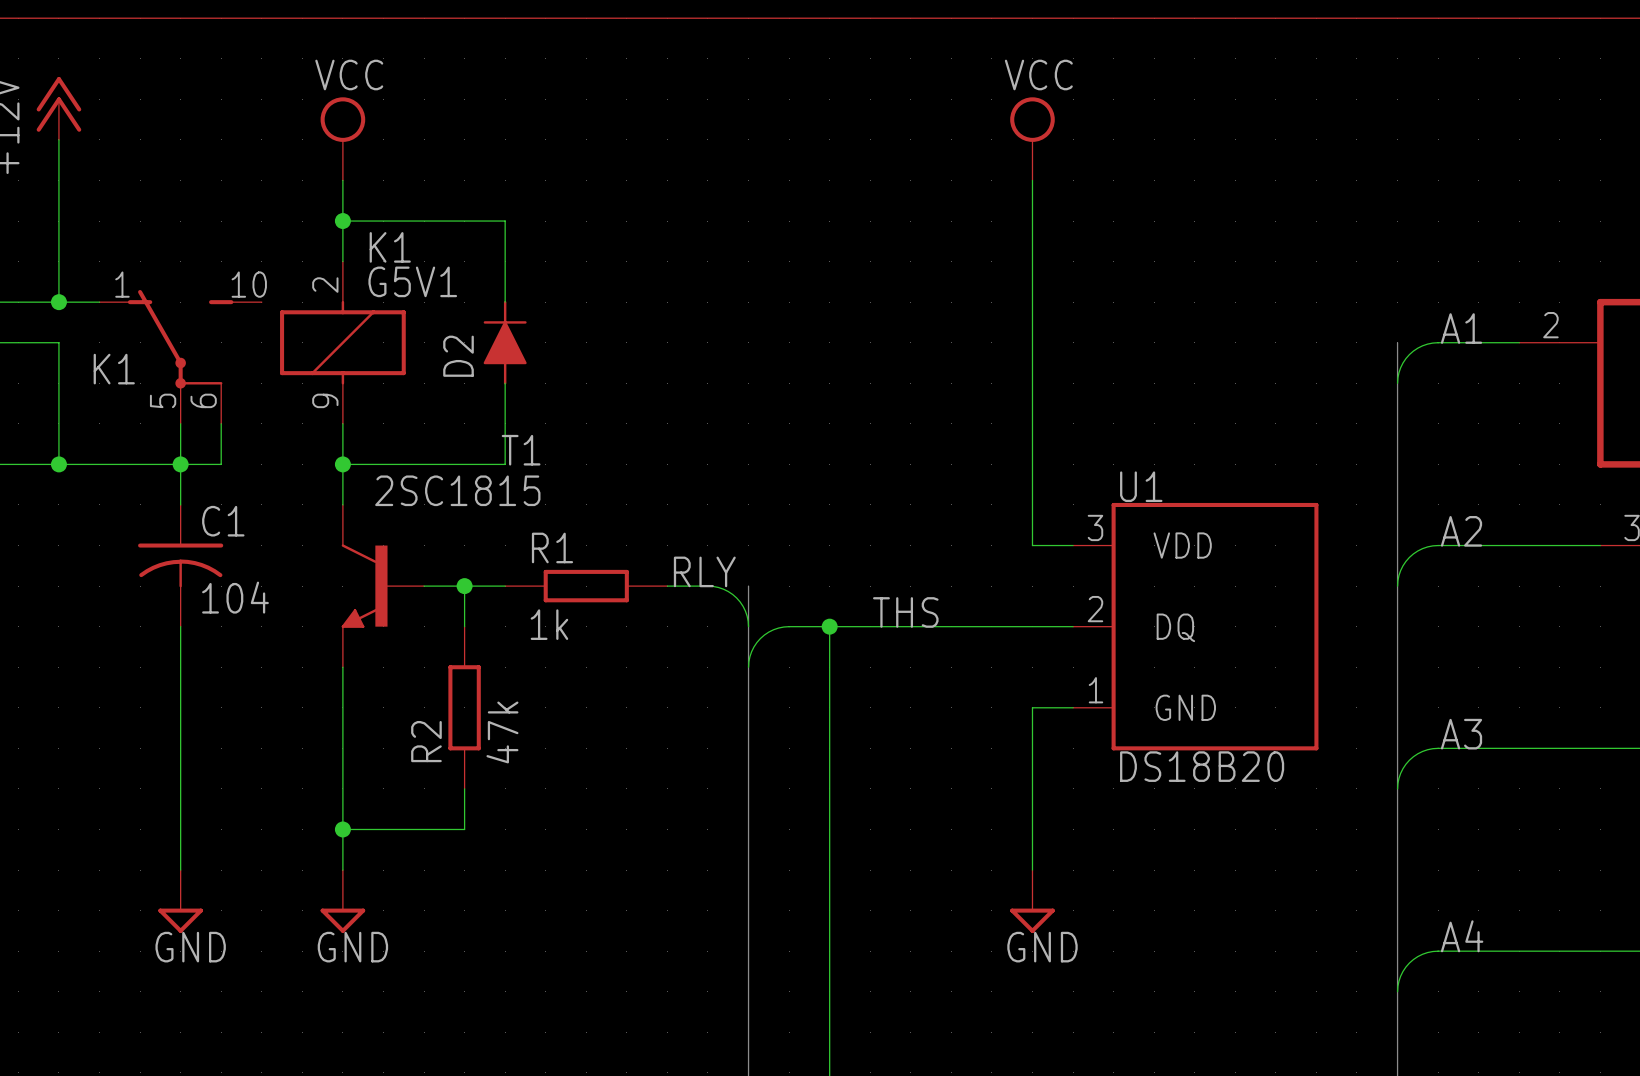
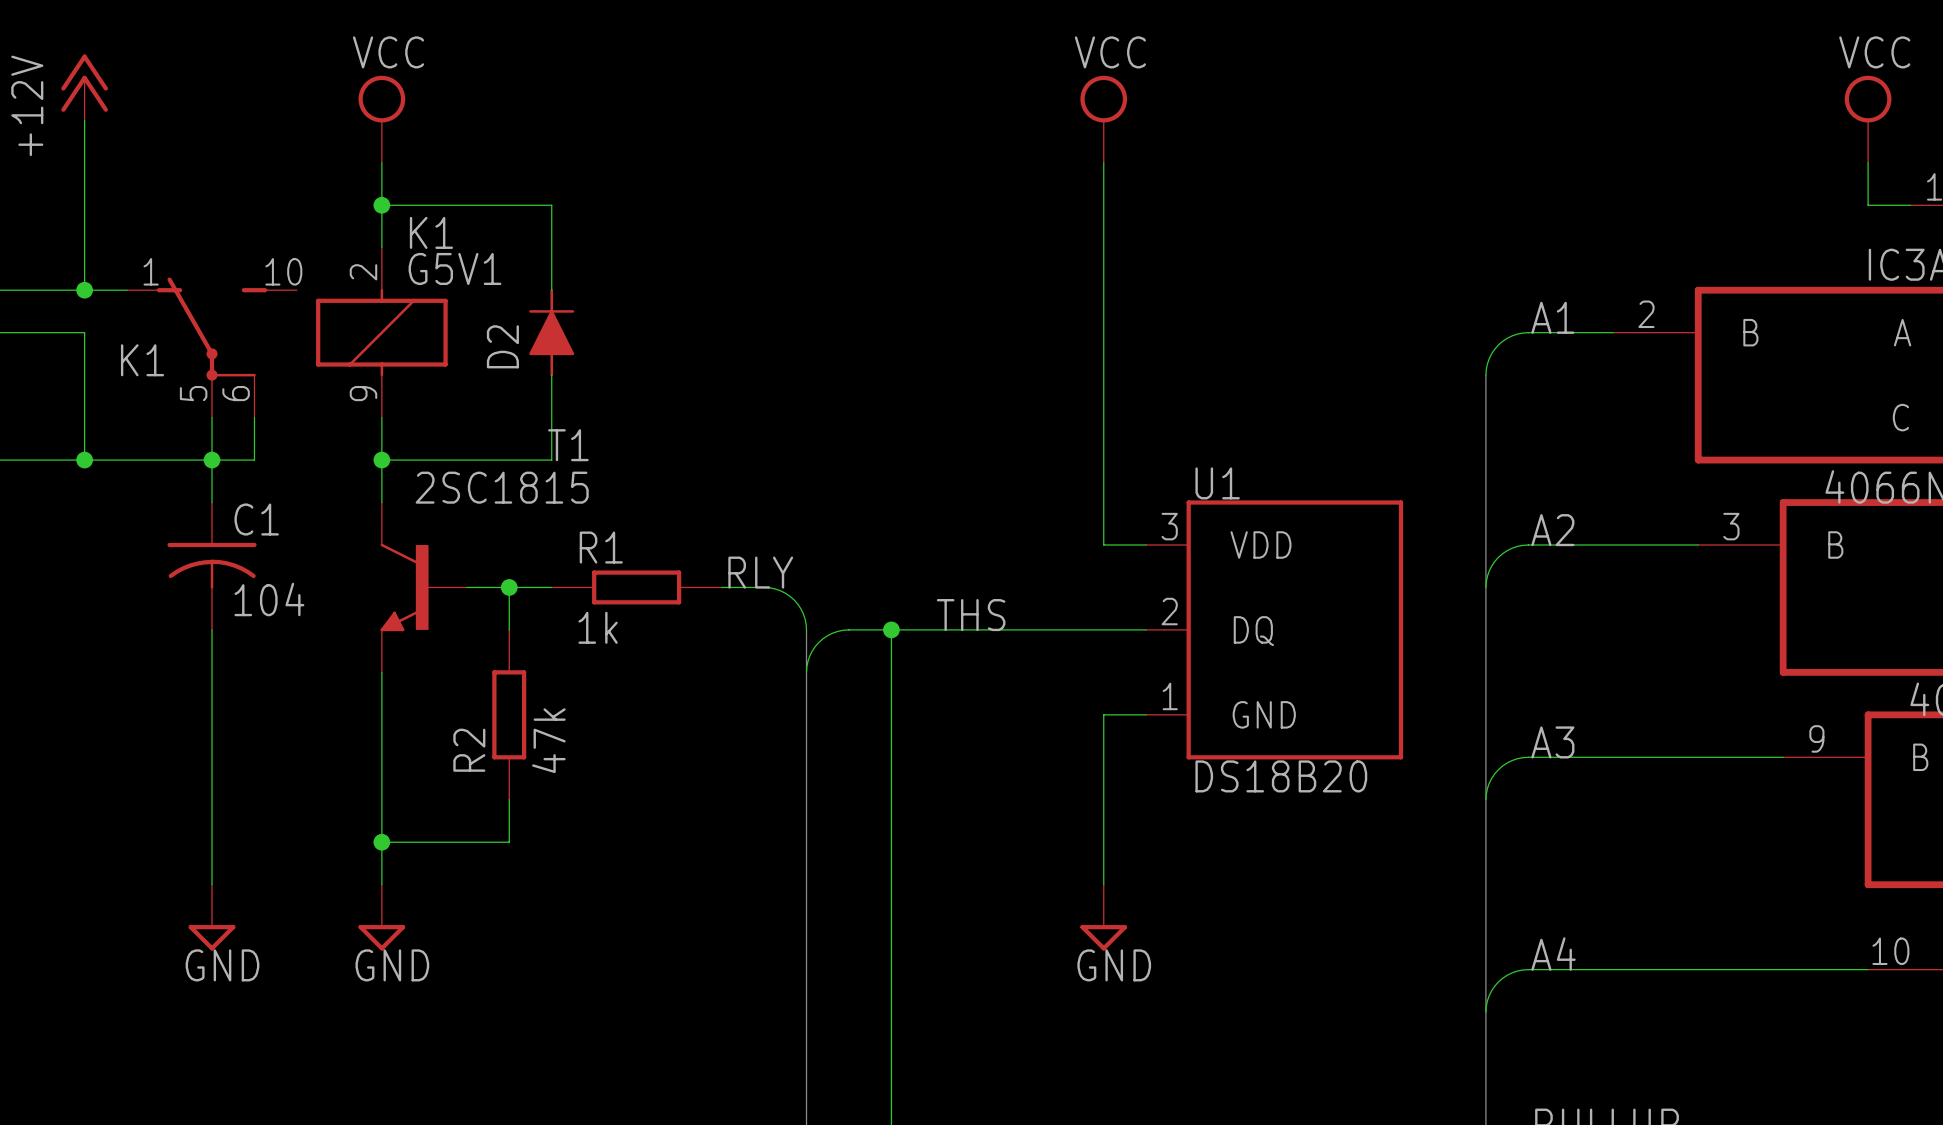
bus: (1397, 342) (1397, 383) -> none
bus: (748, 586) (748, 626) -> none

